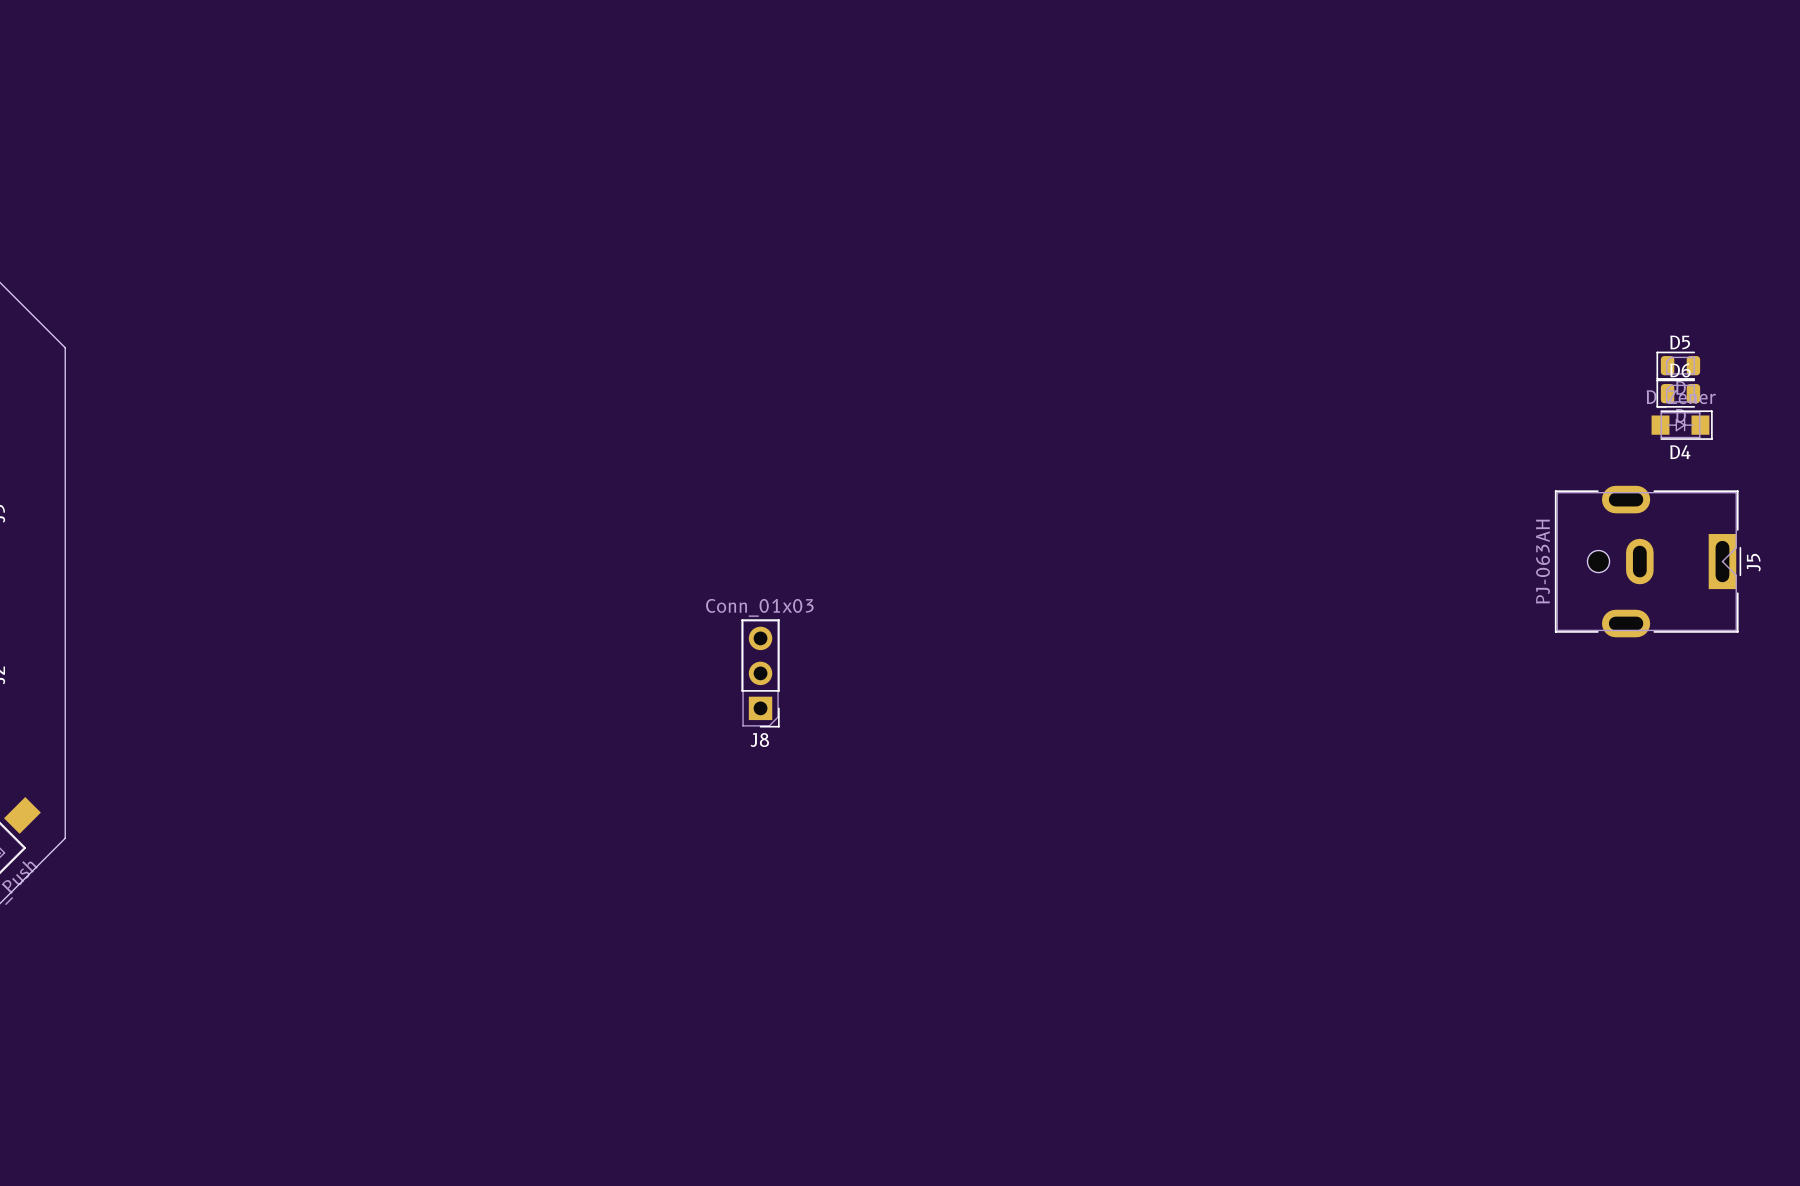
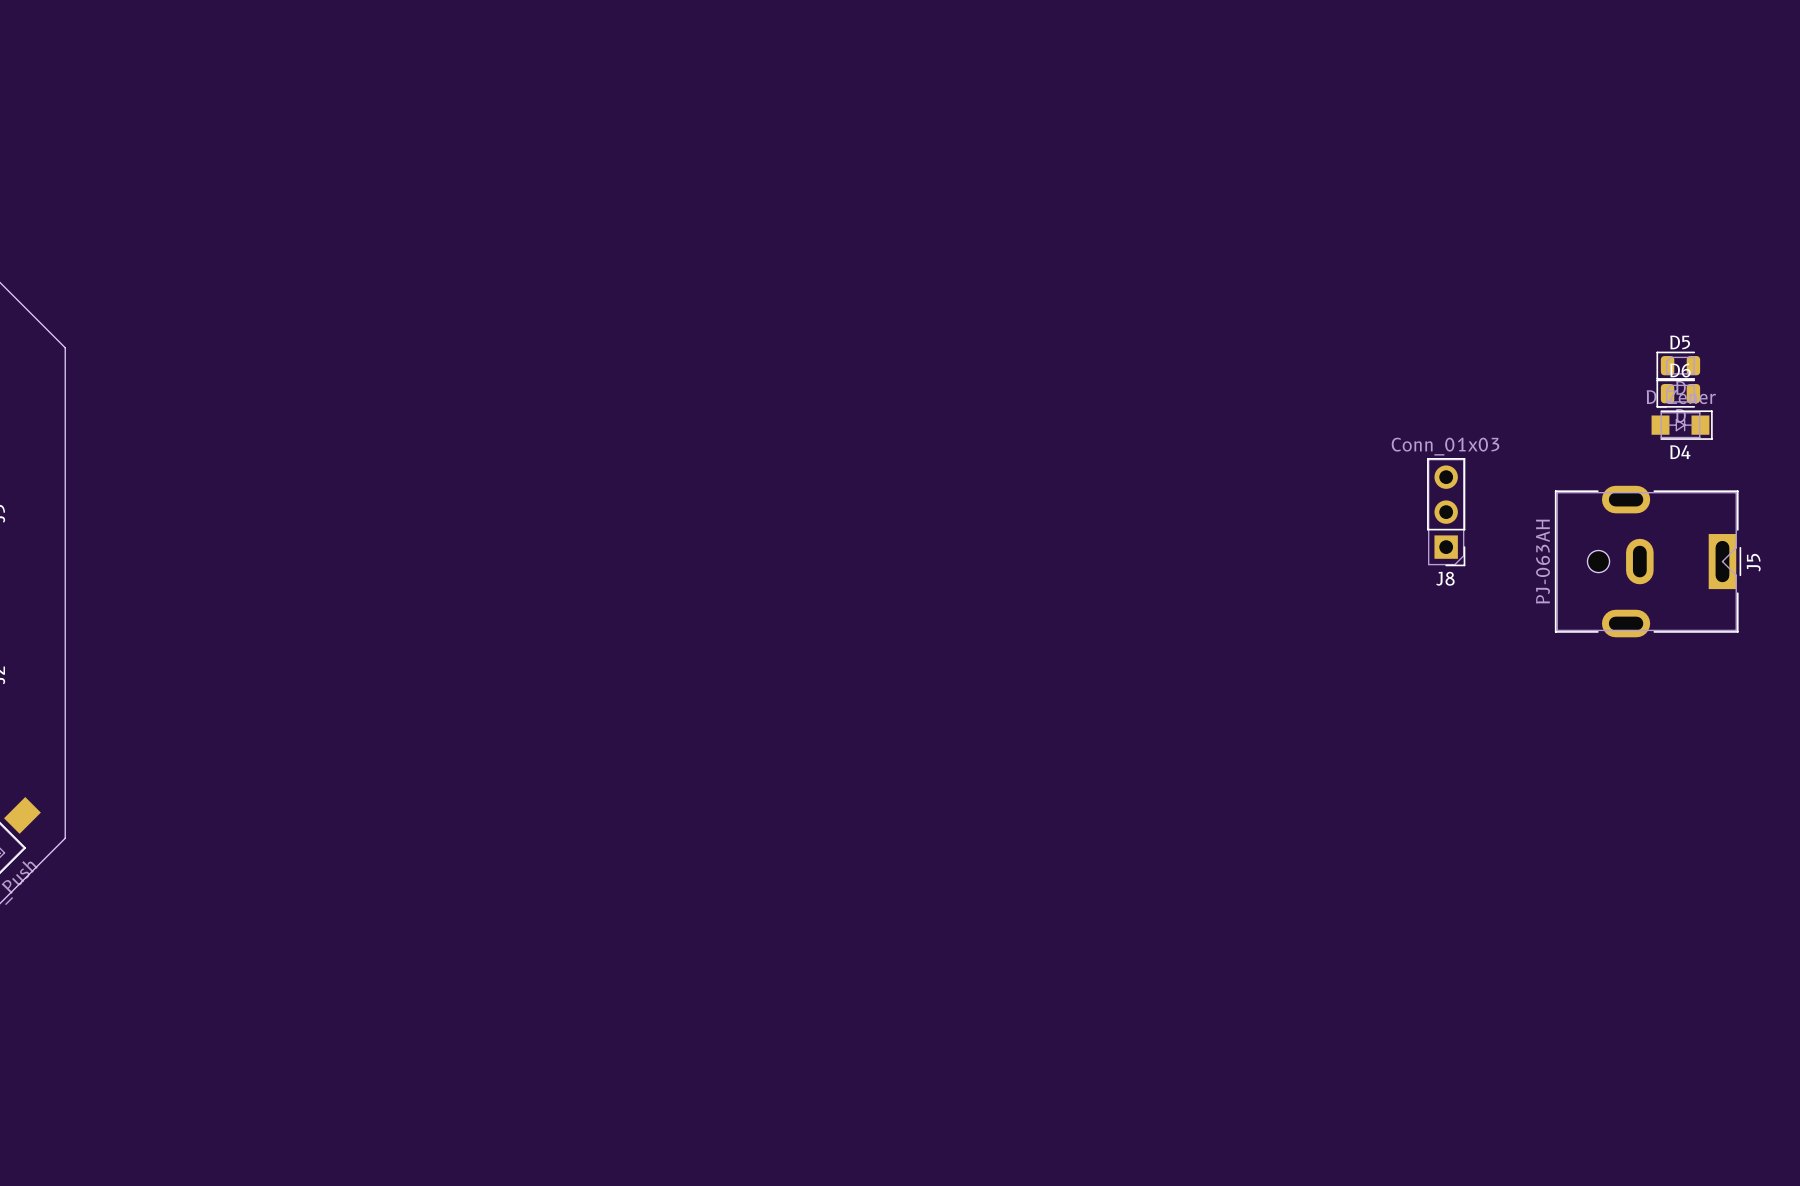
J8 position: (760, 673) -> (1446, 512)

